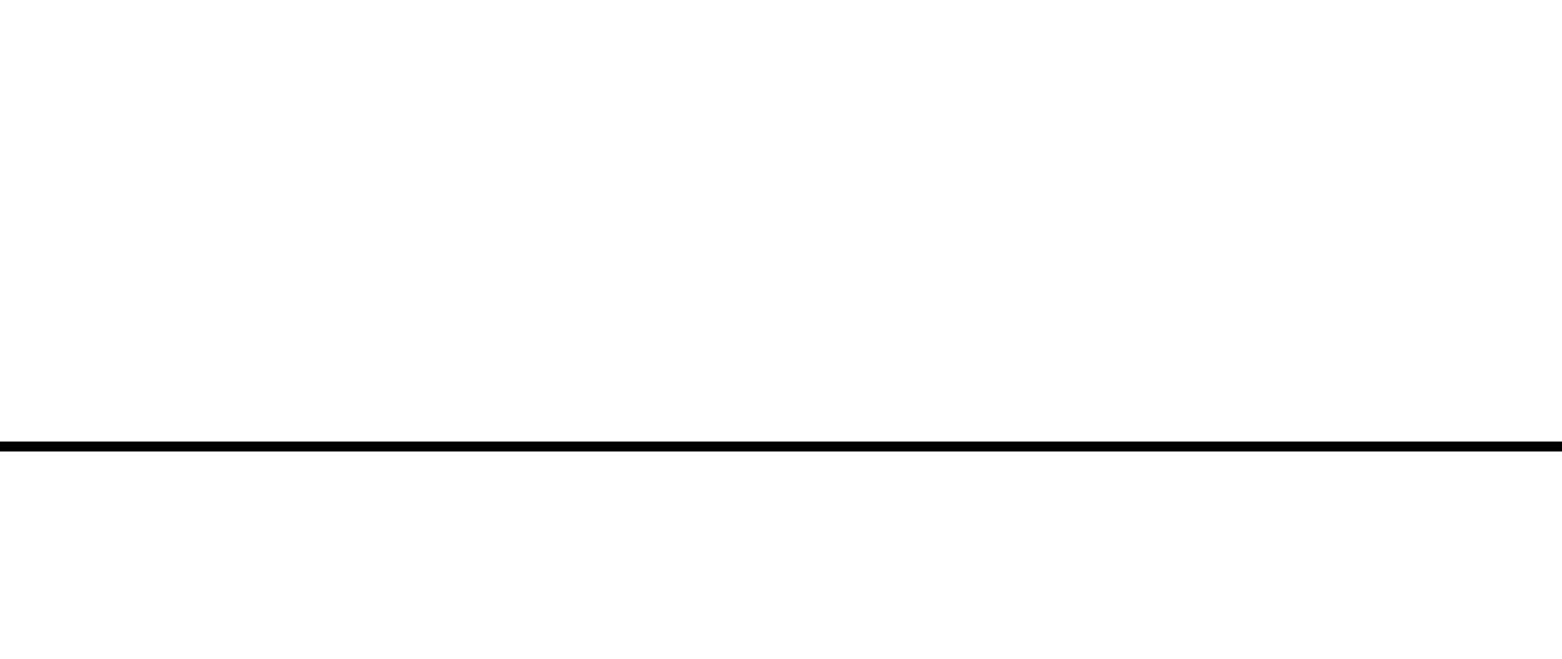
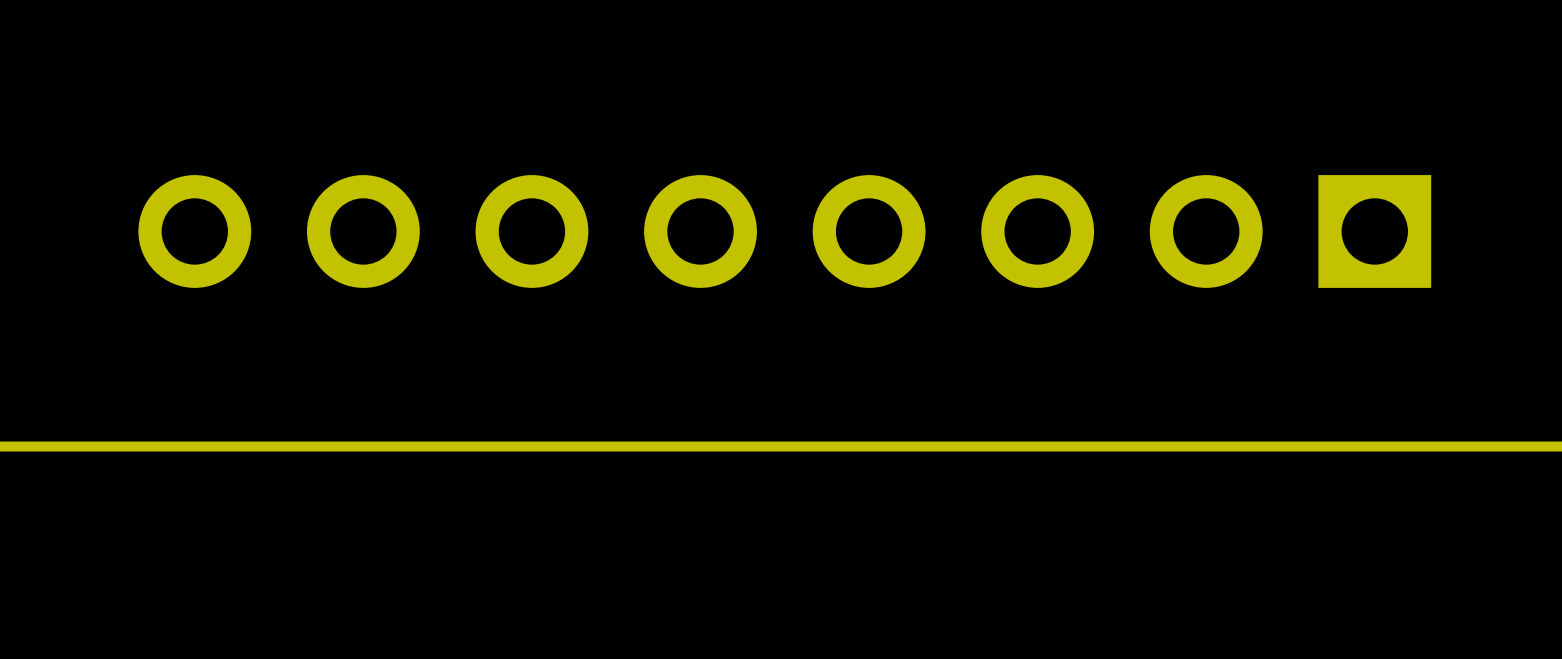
part: none -> (784, 231)

